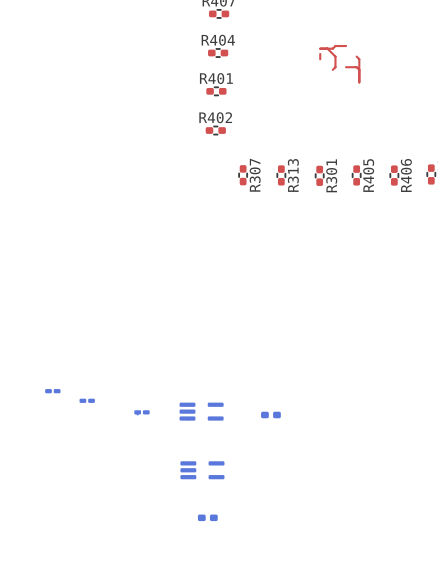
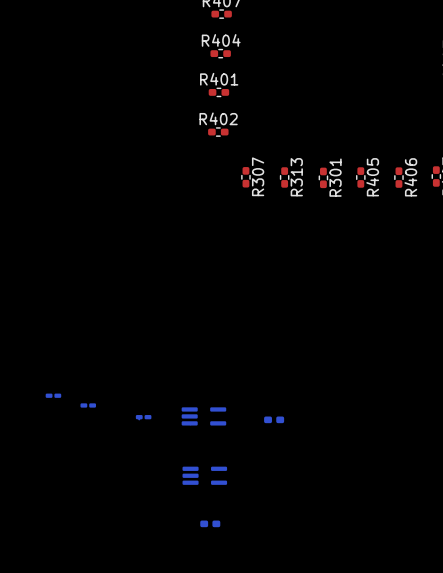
top track: (346, 46) (320, 48) -> none
top track: (327, 48) (335, 56) (335, 67) (332, 69) -> none
top track: (320, 53) (320, 59) -> none
top track: (356, 56) (359, 59) (359, 82) -> none
top track: (346, 67) (356, 67) (359, 69) -> none

